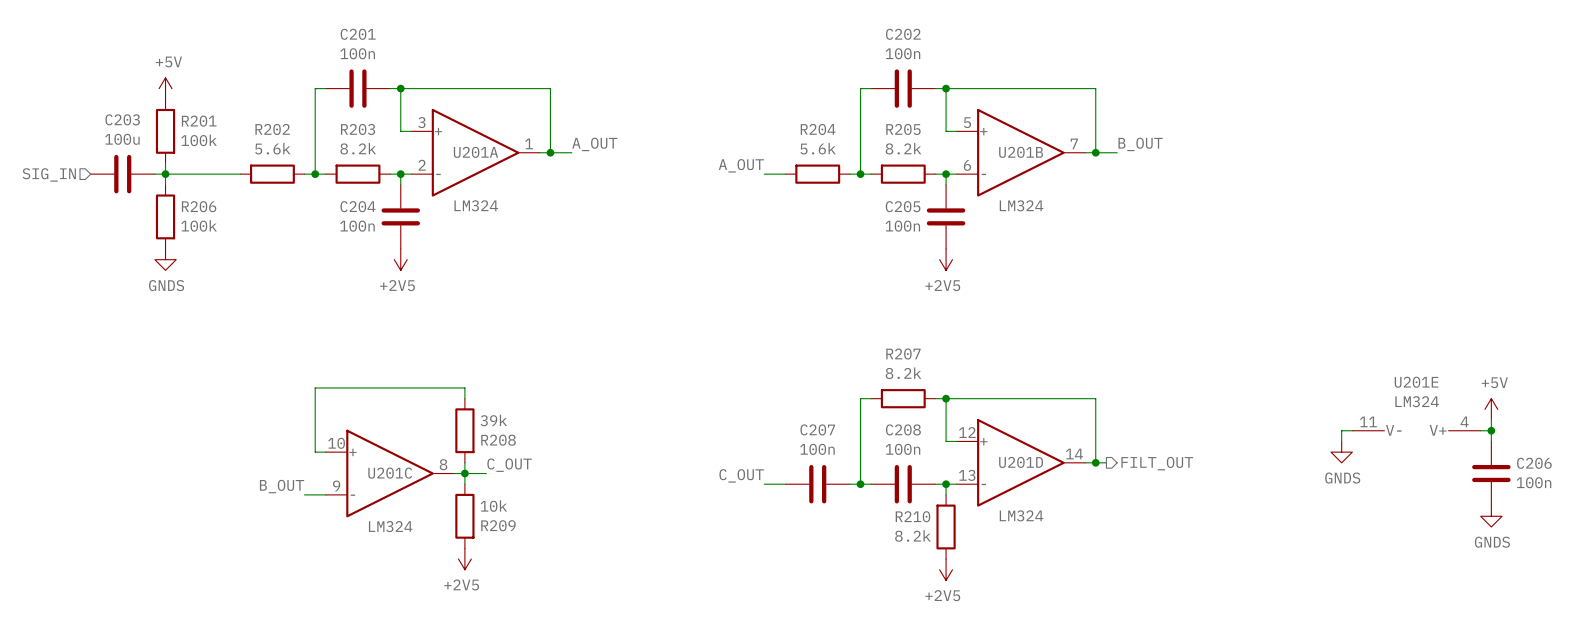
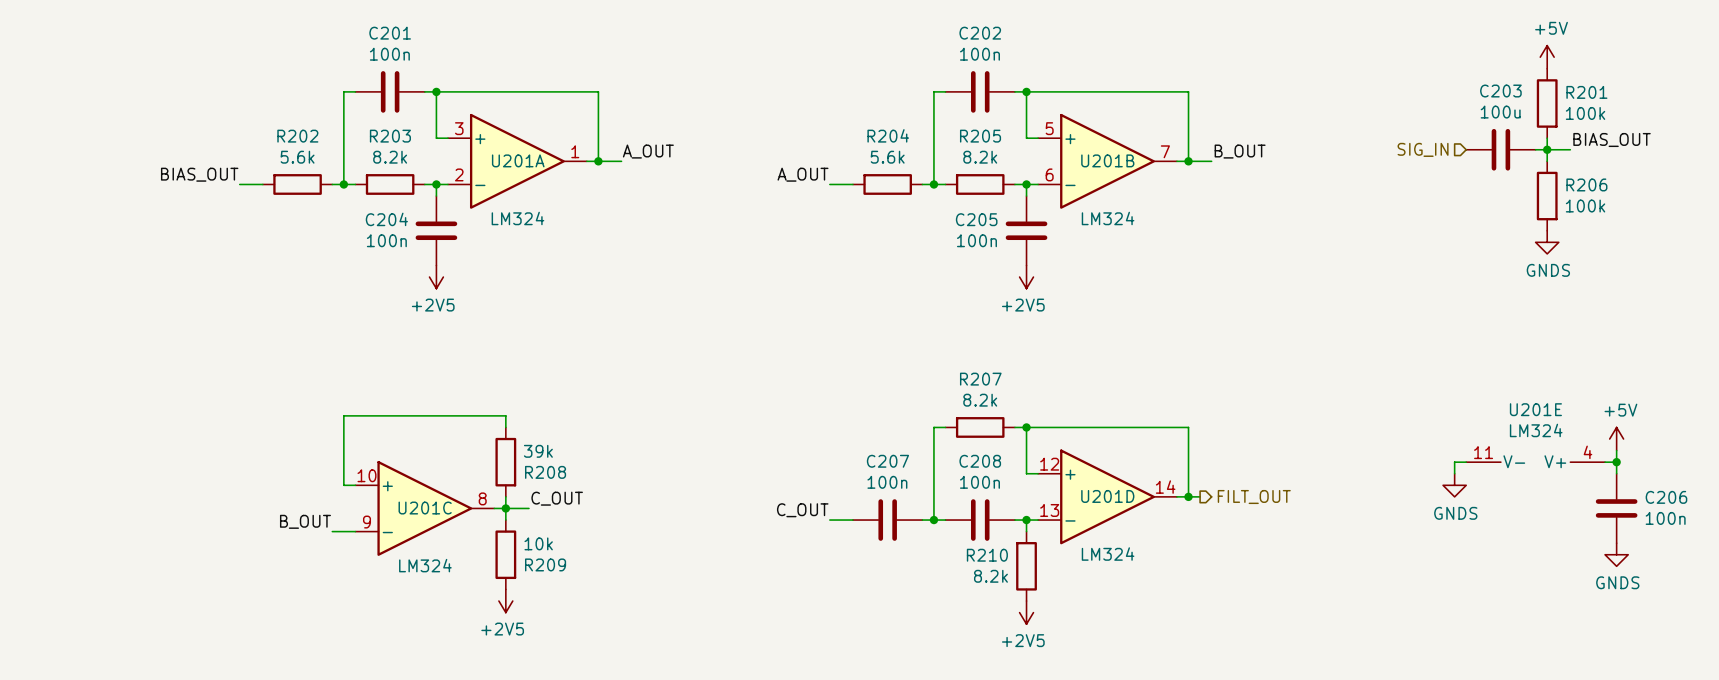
power symbol: none -> +5V (1547, 57)
power symbol: +5V (165, 88) -> none
R201 position: (165, 131) -> (1547, 103)
wire: none -> (1547, 138) (1547, 161)
label: none -> BIAS_OUT (1612, 139)
hierarchical label: none -> SIG_IN (1423, 149)
wire: none -> (1535, 149) (1570, 149)
junction: none -> (1547, 149)
wire: (165, 163) (165, 184) -> none
label: none -> BIAS_OUT (199, 174)
hierarchical label: SIG_IN (49, 174) -> none
C203 position: (122, 174) -> (1500, 149)
wire: (154, 174) (218, 174) -> none
junction: (165, 174) -> none
R206 position: (165, 216) -> (1547, 196)
power symbol: none -> GNDS (1547, 242)
power symbol: GNDS (165, 259) -> none

